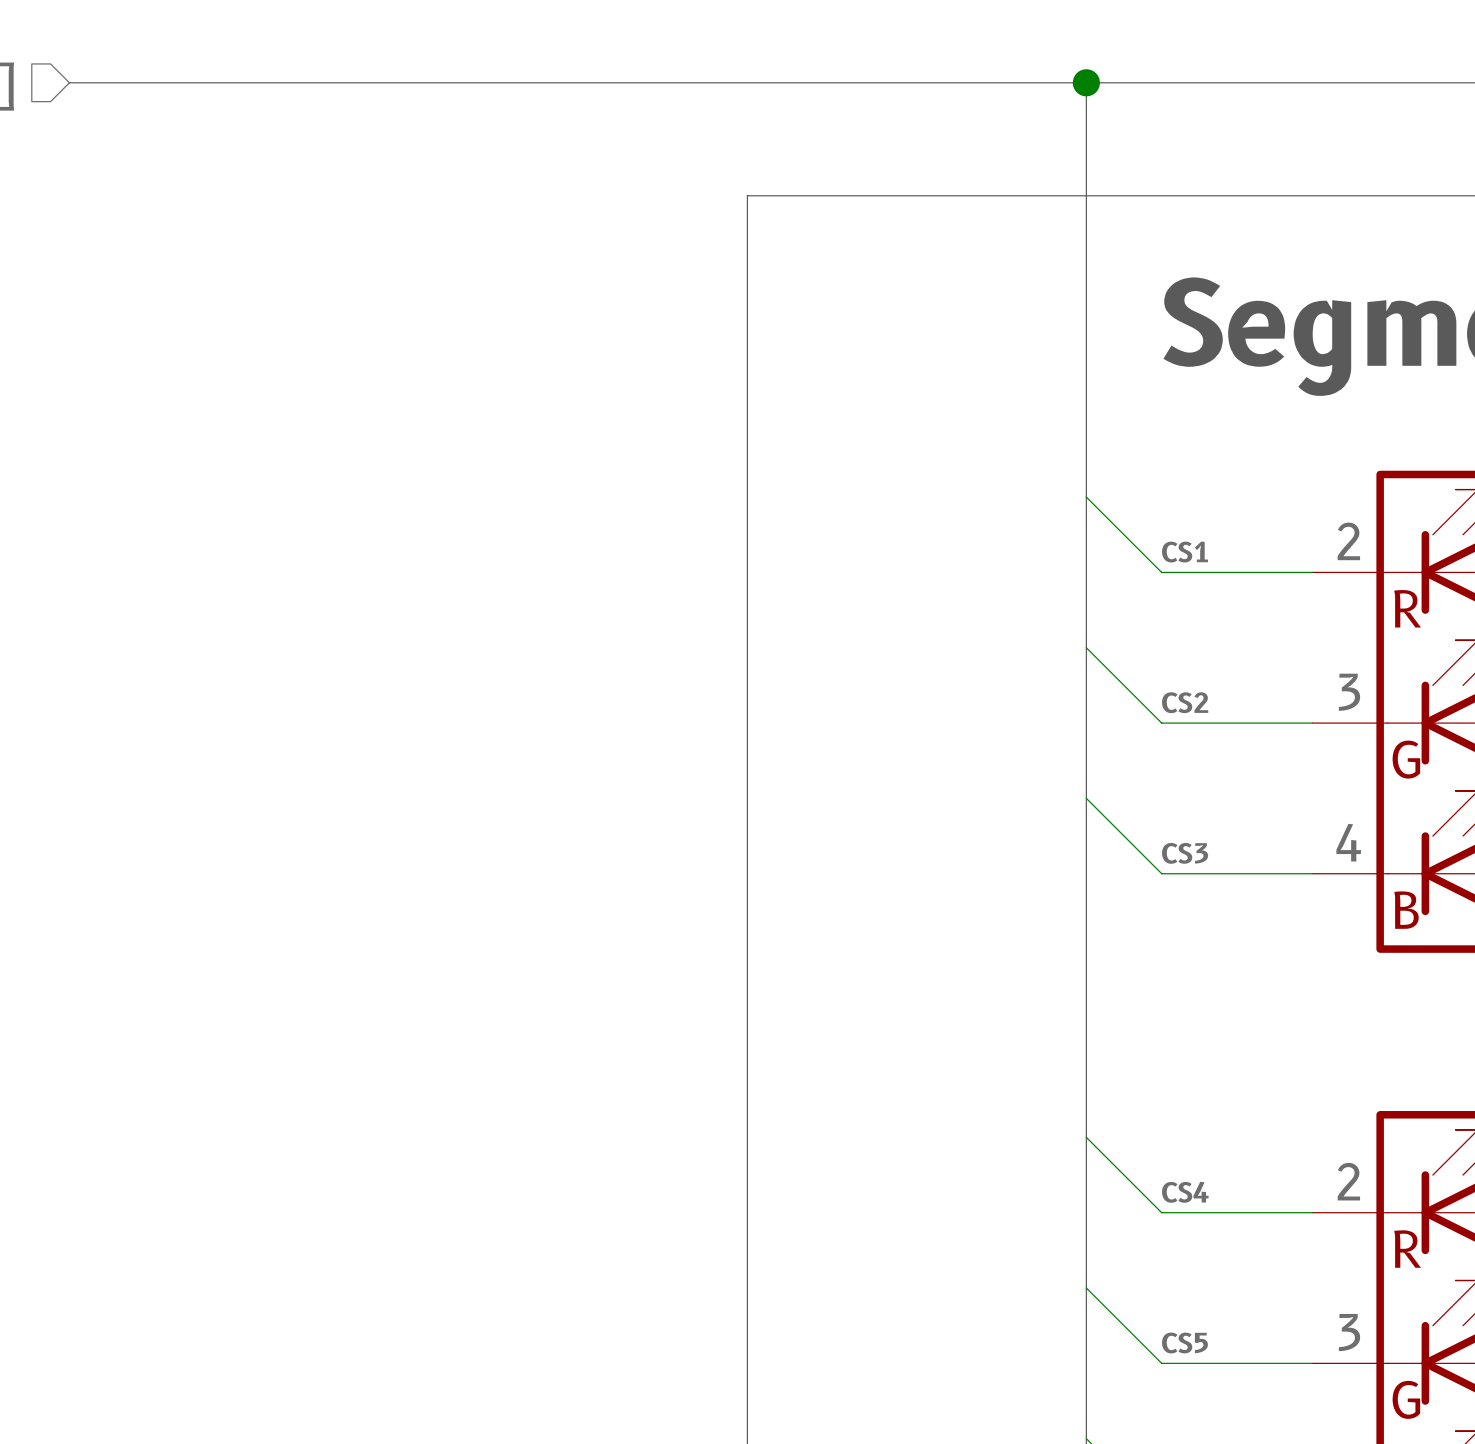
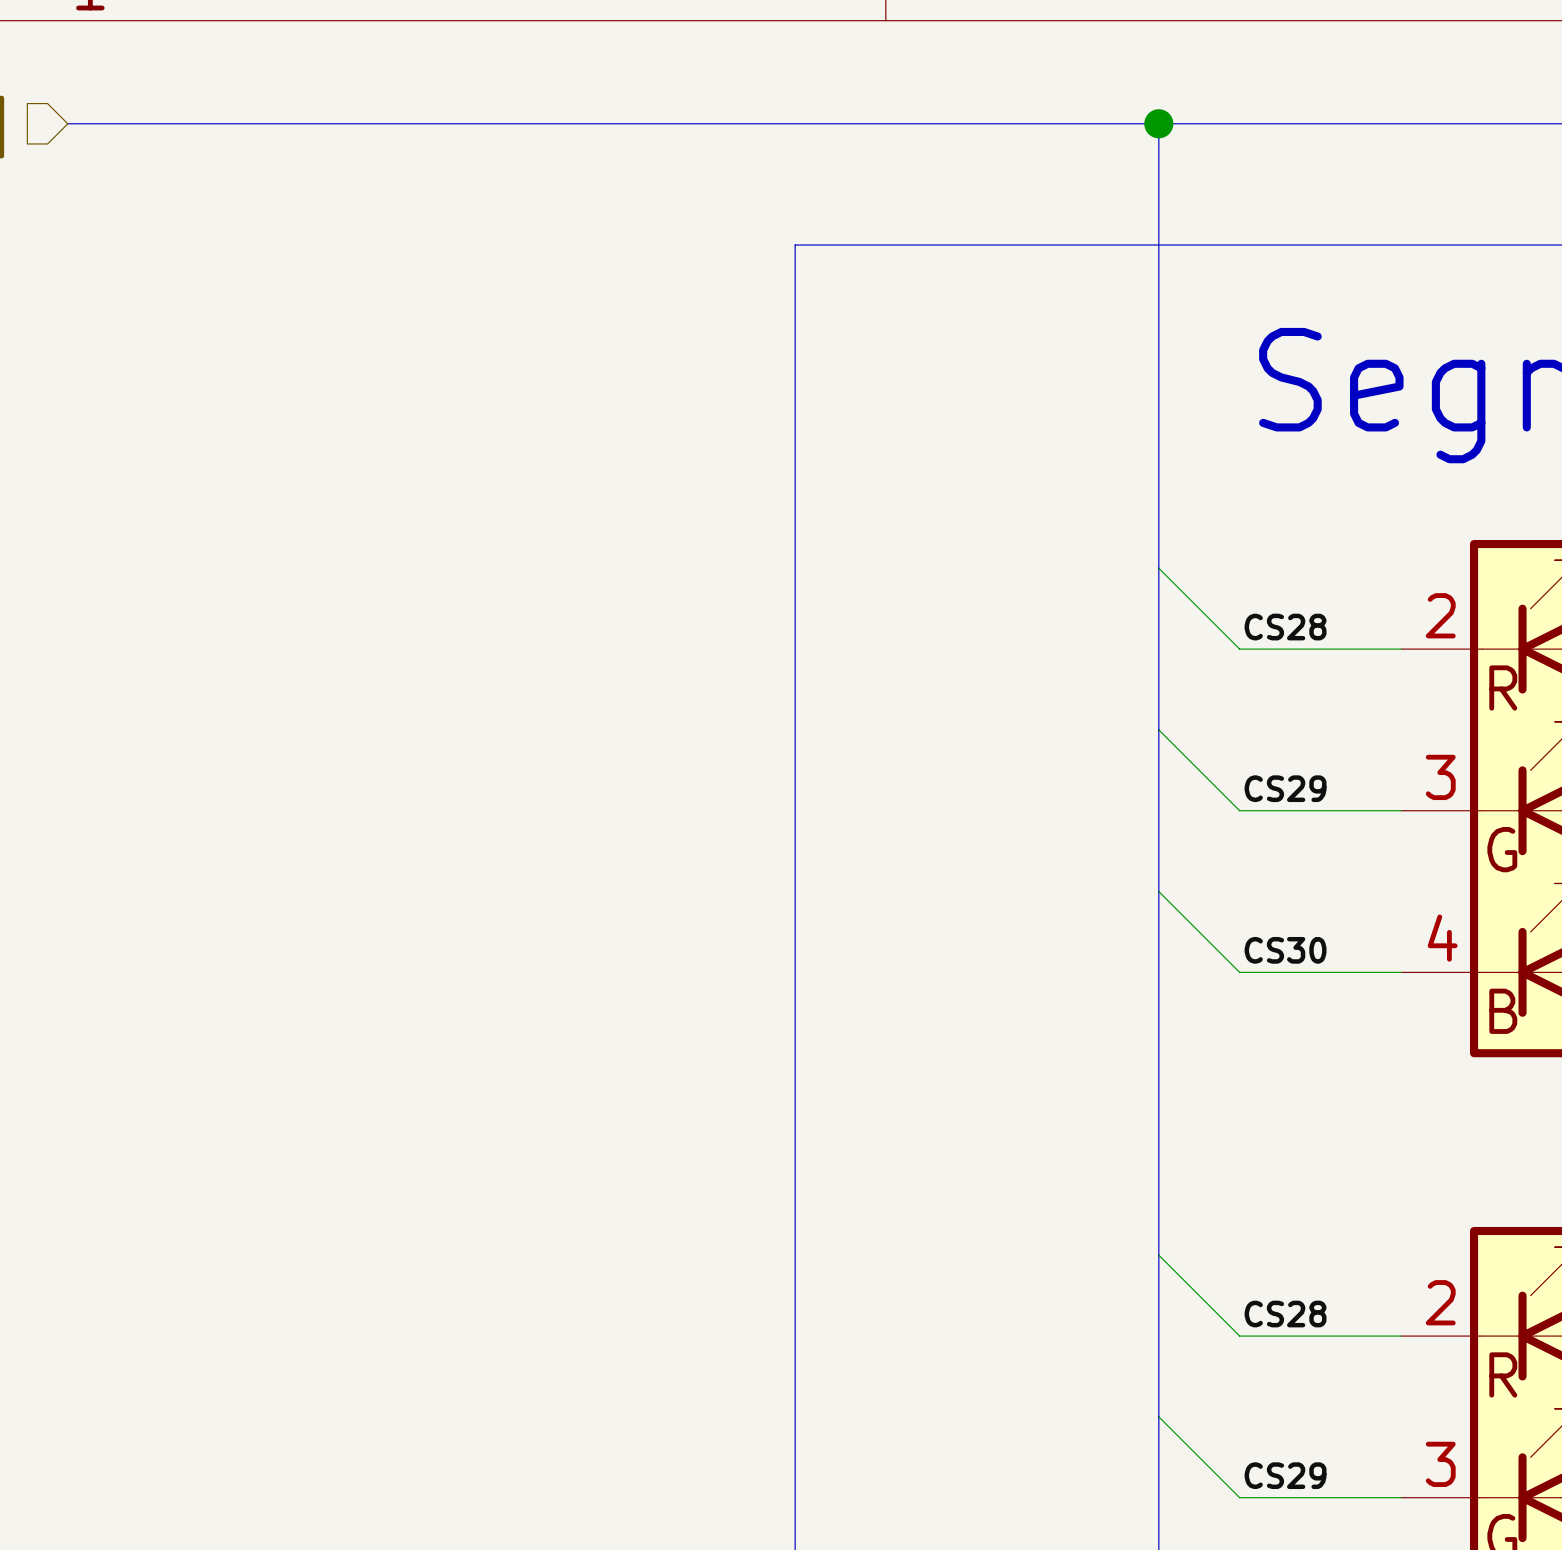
label: CS1 (1185, 552) -> CS28 (1285, 627)
label: CS2 (1185, 702) -> CS29 (1285, 788)
label: CS3 (1185, 853) -> CS30 (1285, 950)
label: CS4 (1185, 1192) -> CS28 (1285, 1314)
label: CS5 (1184, 1342) -> CS29 (1285, 1475)

